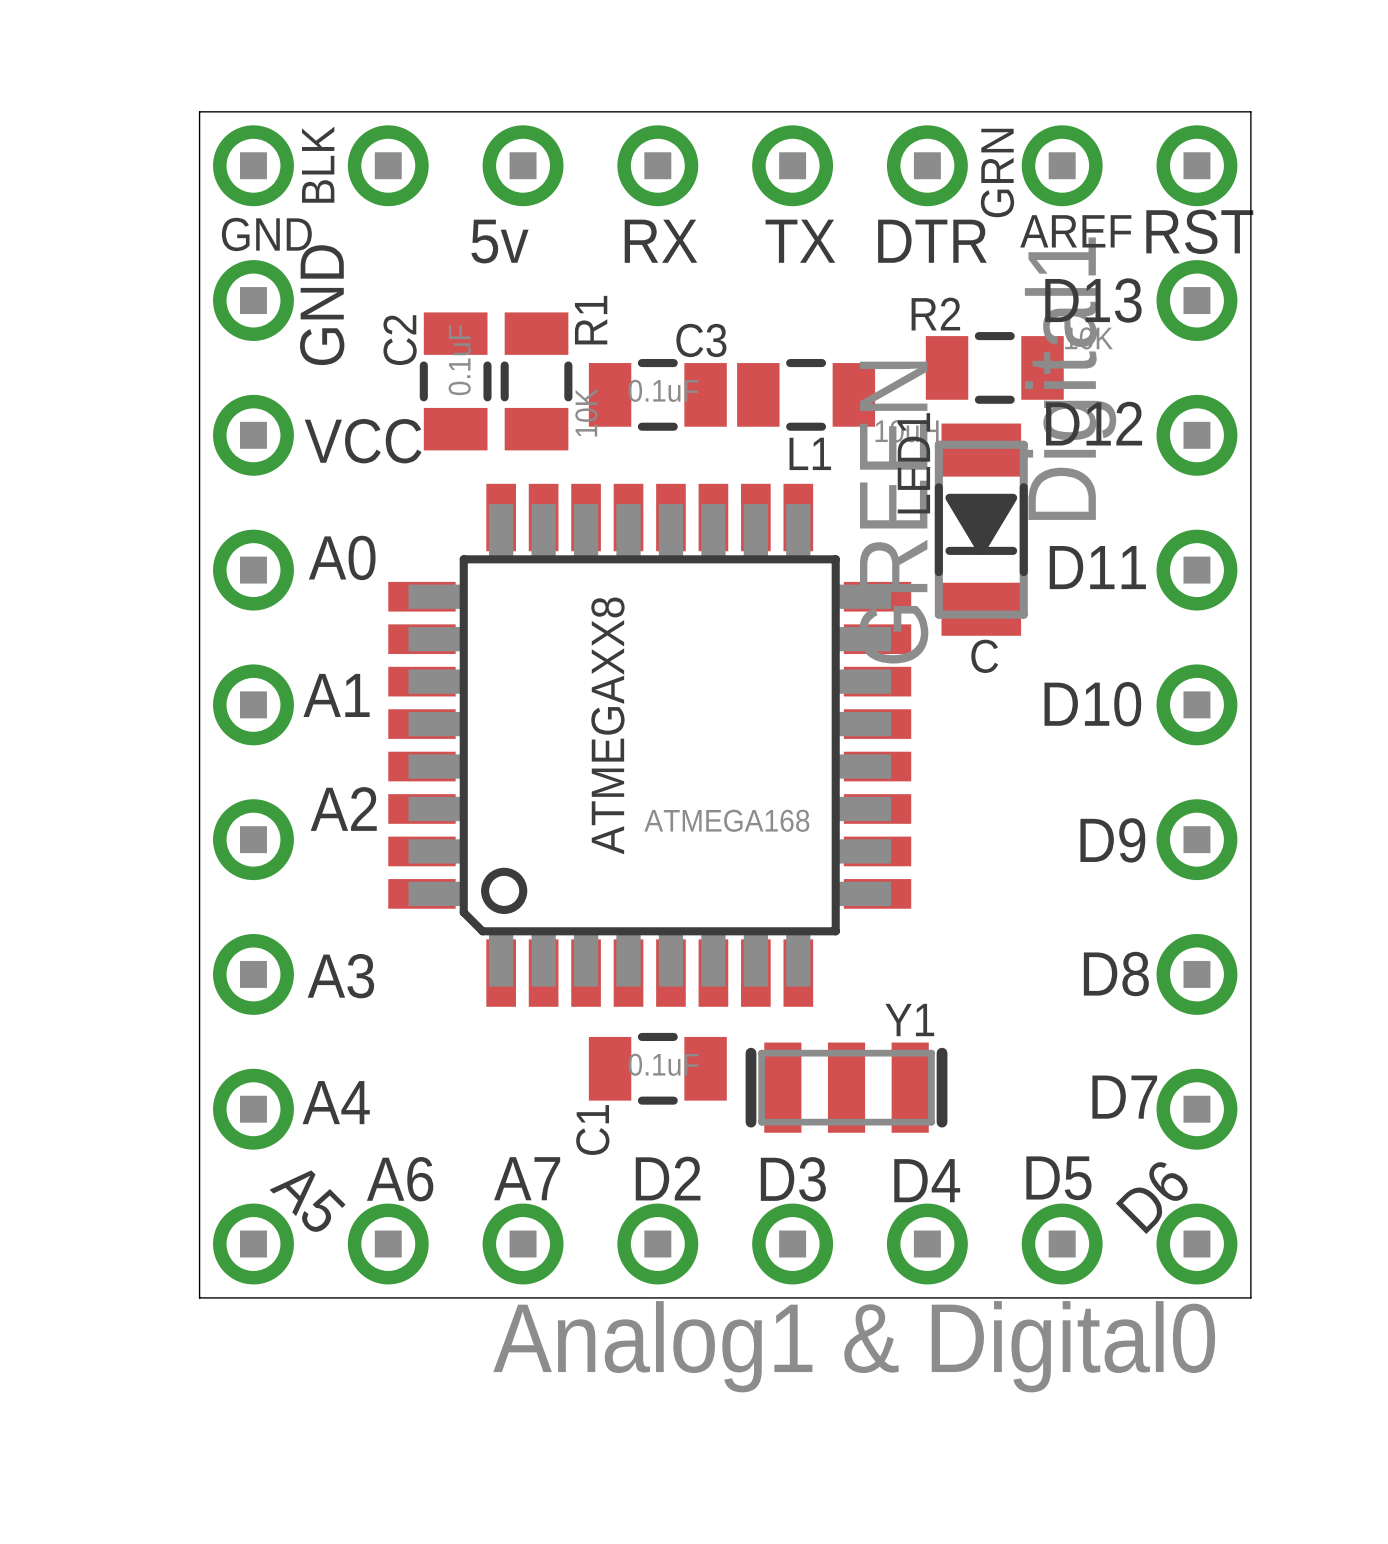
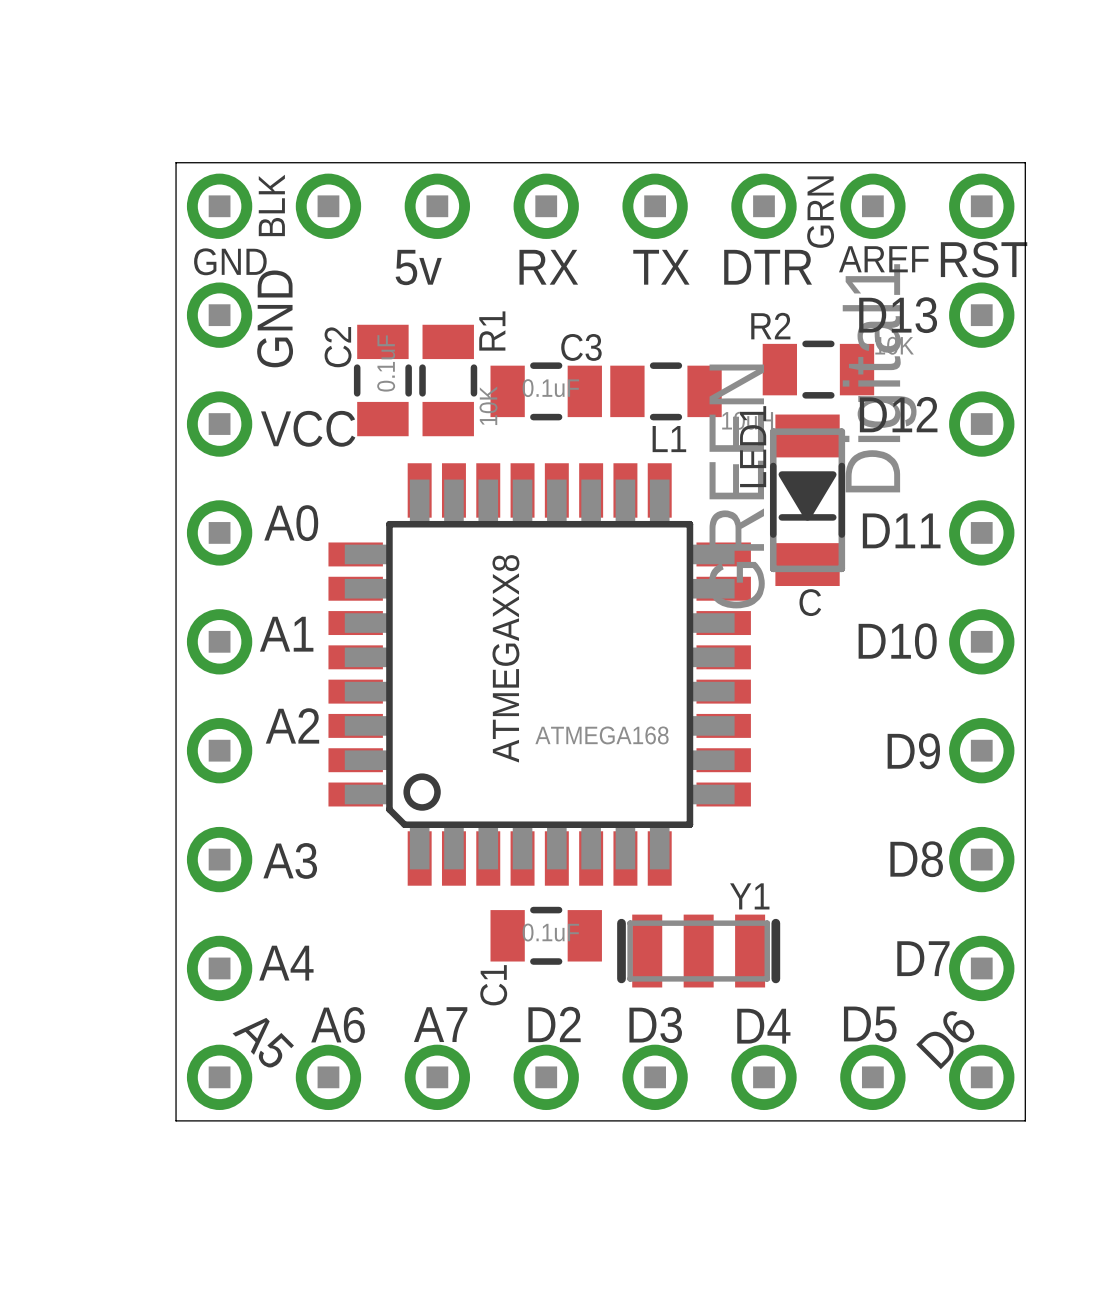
part value: Analog1 & Digital0 (854, 1346) -> none

